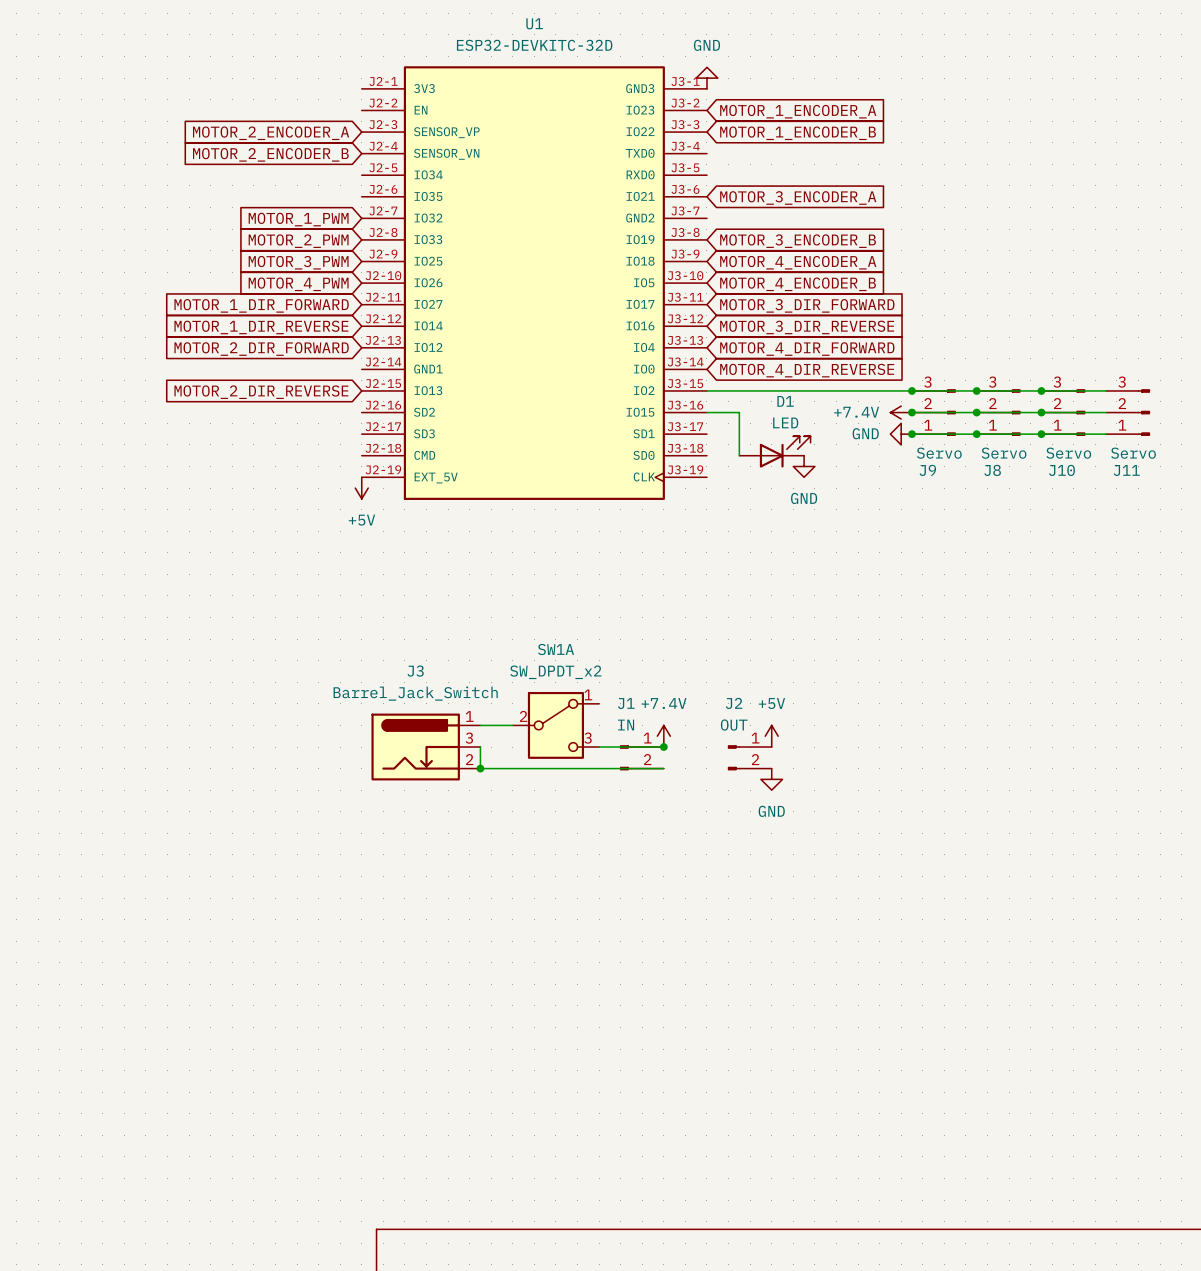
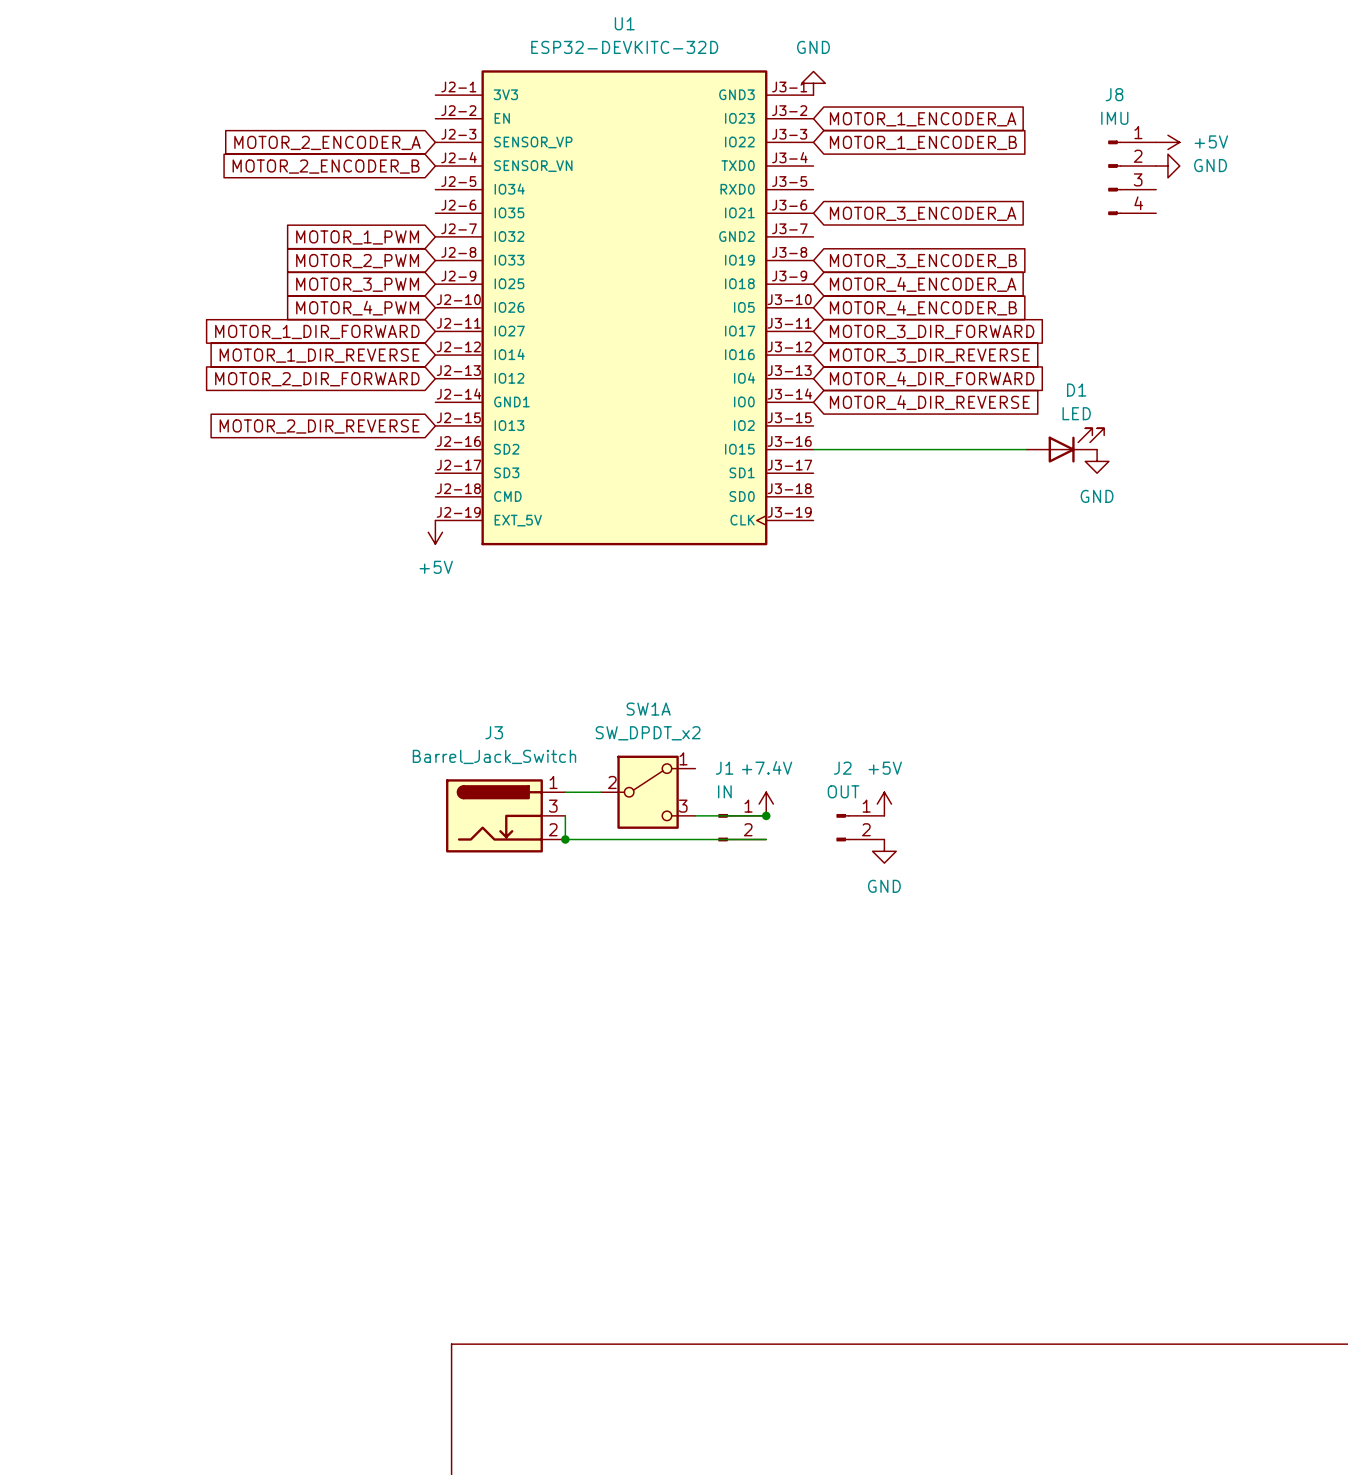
power symbol: none -> +5V (1167, 142)
power symbol: none -> GND (1167, 166)
J8 symbol: [976, 389, 1021, 436] -> [1108, 140, 1157, 216]
wire: (706, 390) (1106, 390) -> none
junction: (911, 390) -> none
junction: (976, 390) -> none
junction: (1041, 390) -> none
wire: (739, 412) (739, 455) -> (848, 449) (1026, 449)
power symbol: +7.4V (901, 412) -> none
wire: (911, 412) (1106, 412) -> none
junction: (911, 412) -> none
J9: Servo (933, 412) -> none
junction: (976, 412) -> none
junction: (1041, 412) -> none
J10: Servo (1063, 412) -> none
J11: Servo (1128, 412) -> none
power symbol rotation: 0° (901, 434) -> 90° counterclockwise (1097, 461)
power symbol position: GND (901, 434) -> GND (1097, 461)
wire: (911, 434) (1106, 434) -> none
junction: (911, 434) -> none
junction: (976, 434) -> none
junction: (1041, 434) -> none
D1 position: (774, 451) -> (1065, 445)
J8 value: Servo (1004, 453) -> IMU (1114, 118)
power symbol: GND (804, 466) -> none
J8 name position: J8 (992, 470) -> J8 (1114, 94)

